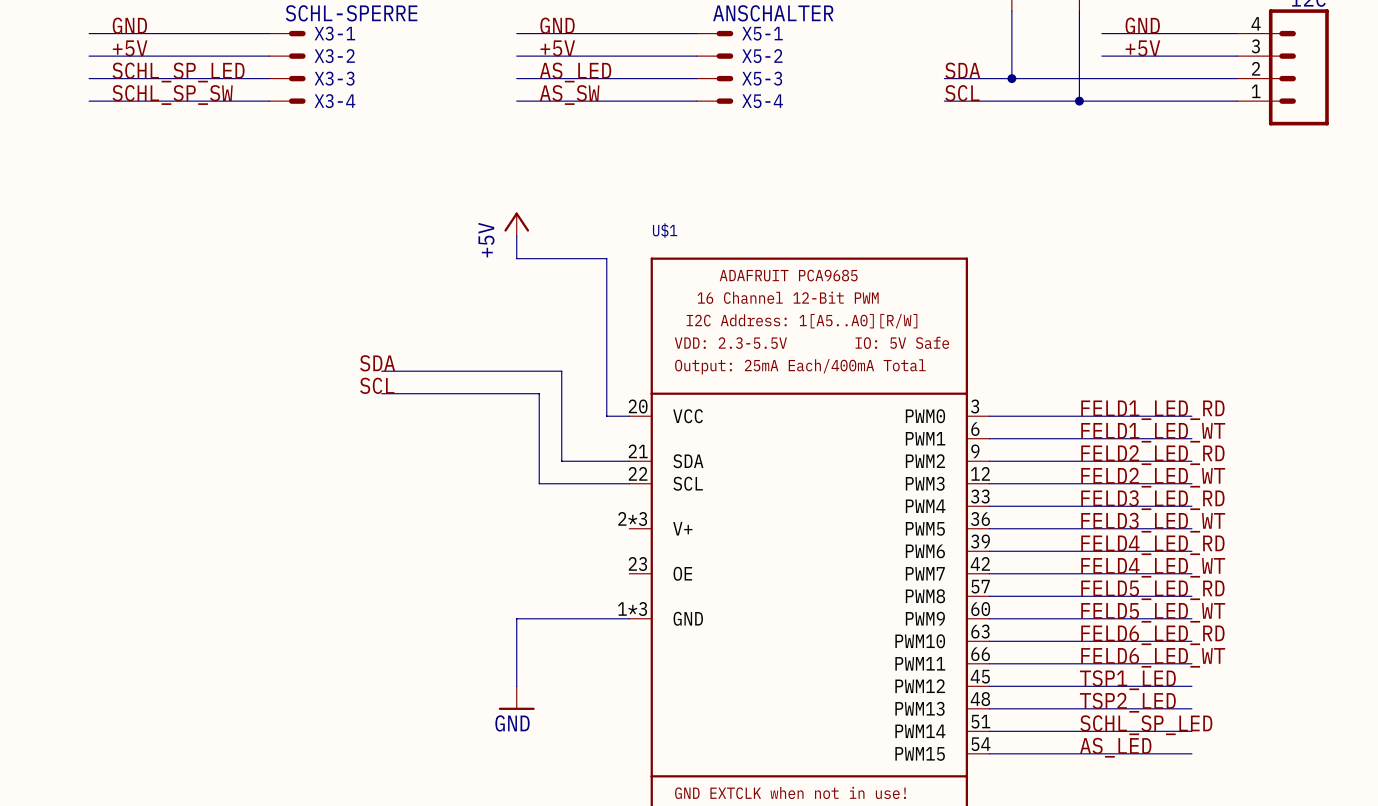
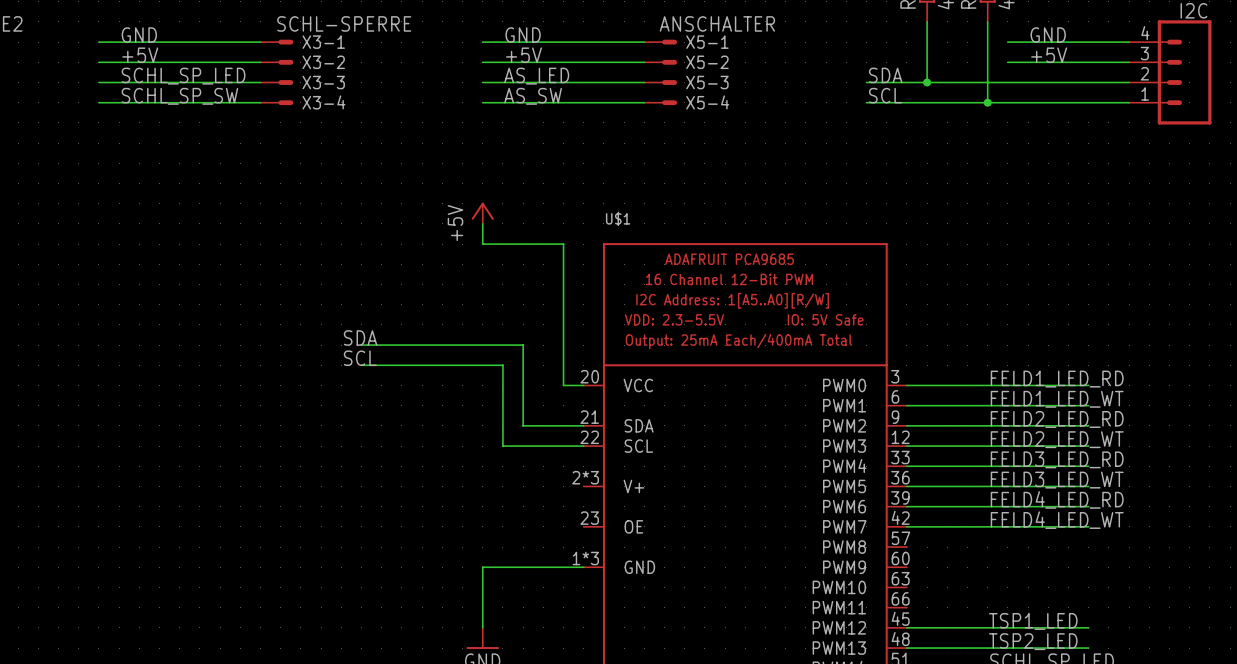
label: FELD5_LED_RD (1152, 590) -> none
wire: (989, 596) (1191, 596) -> none
label: FELD5_LED_WT (1153, 612) -> none
wire: (989, 618) (1191, 618) -> none
label: FELD6_LED_RD (1152, 635) -> none
wire: (989, 641) (1191, 641) -> none
label: FELD6_LED_WT (1153, 657) -> none
wire: (989, 663) (1191, 663) -> none

